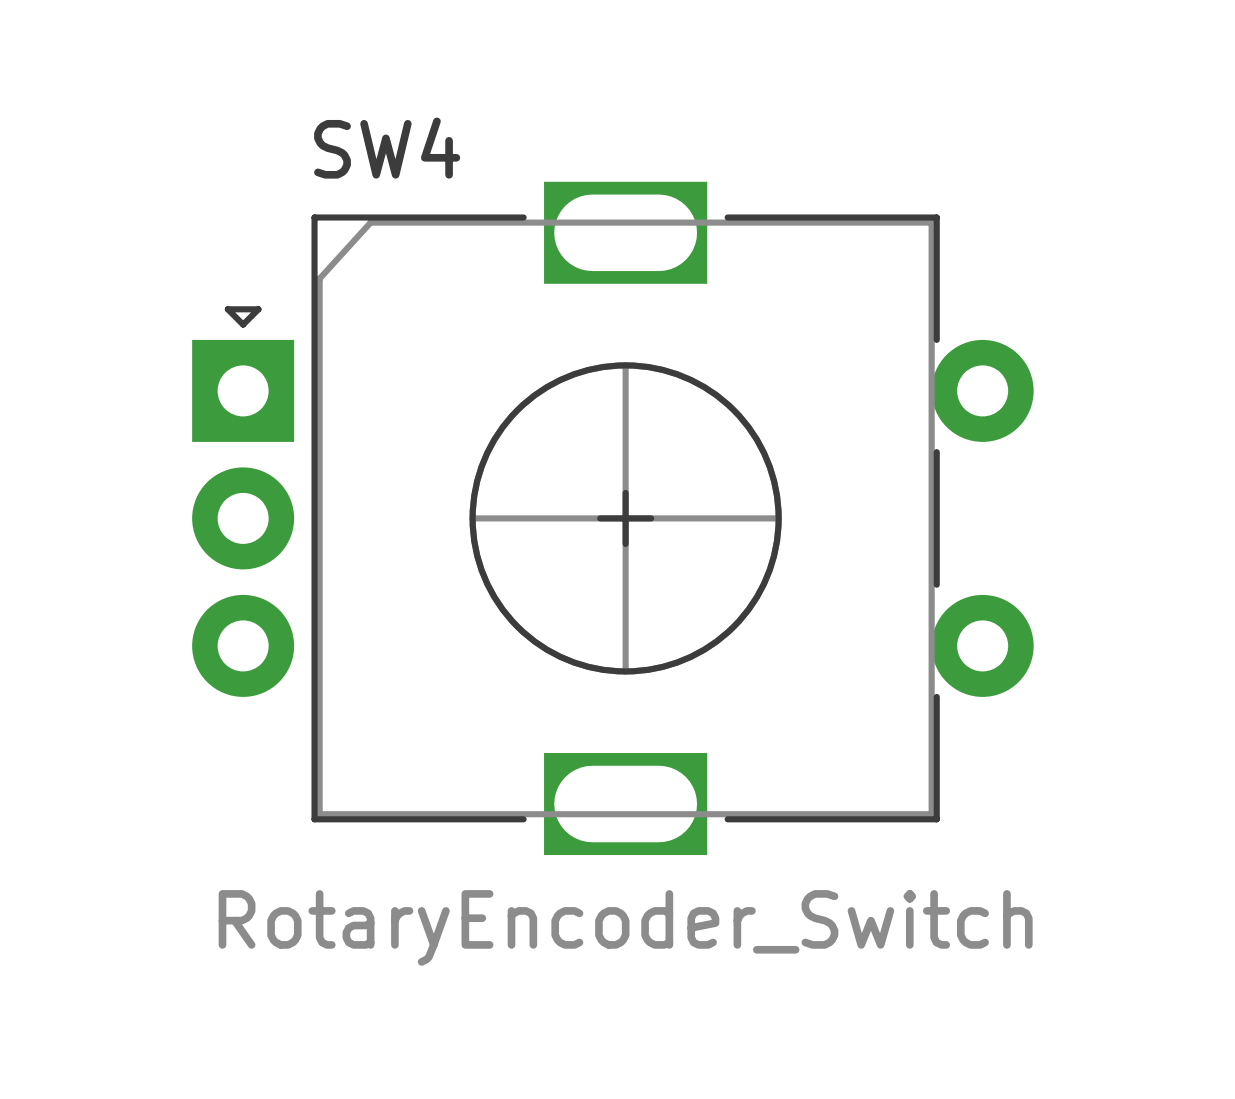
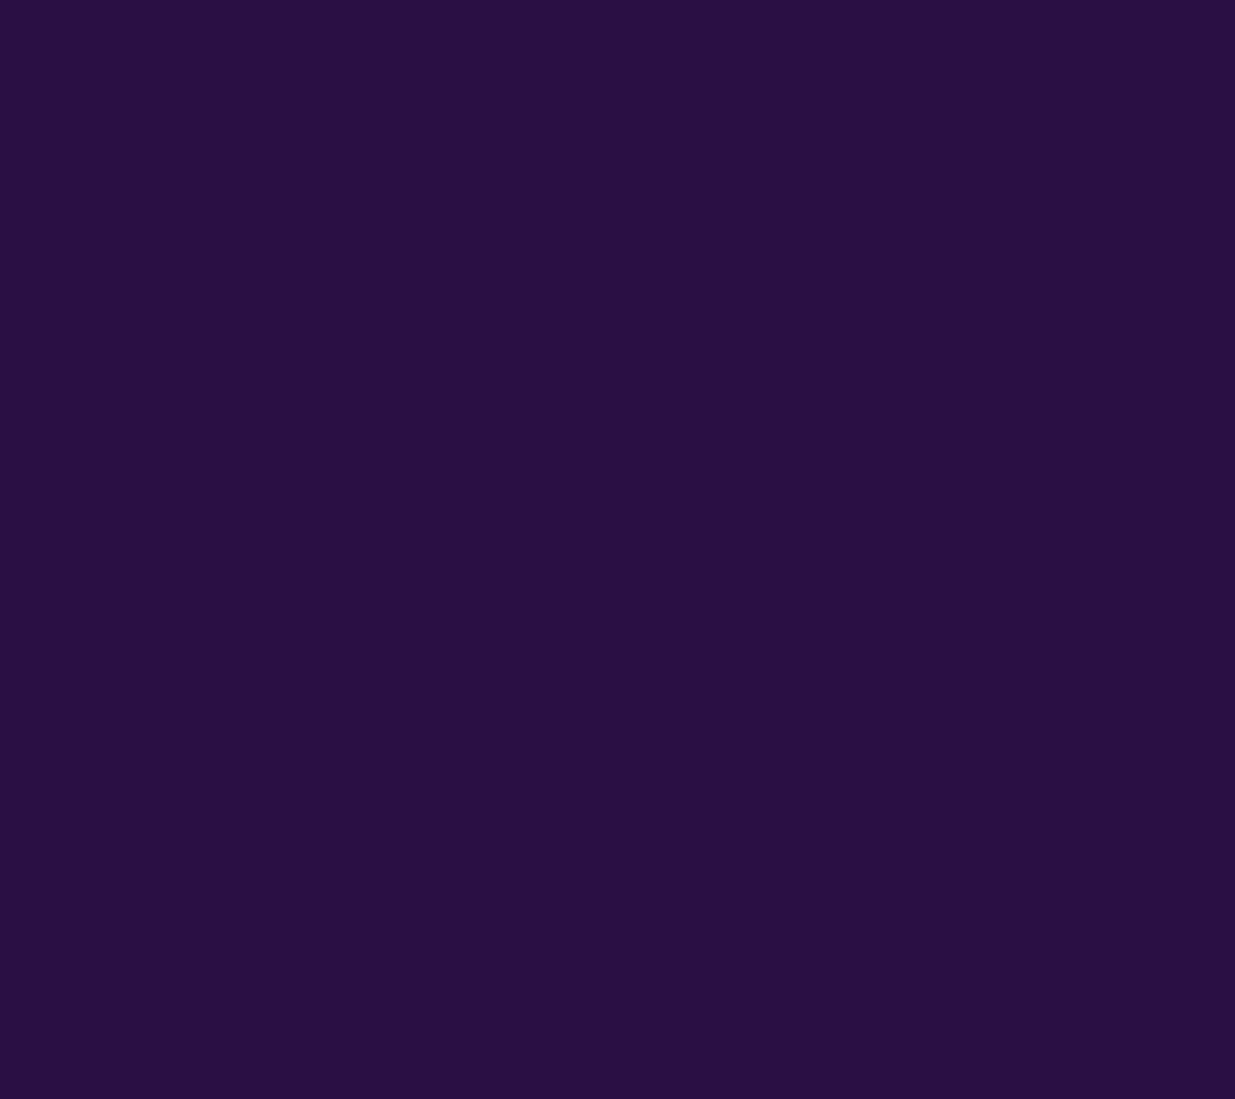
SW4: RotaryEncoder_Switch (612, 518) -> none

